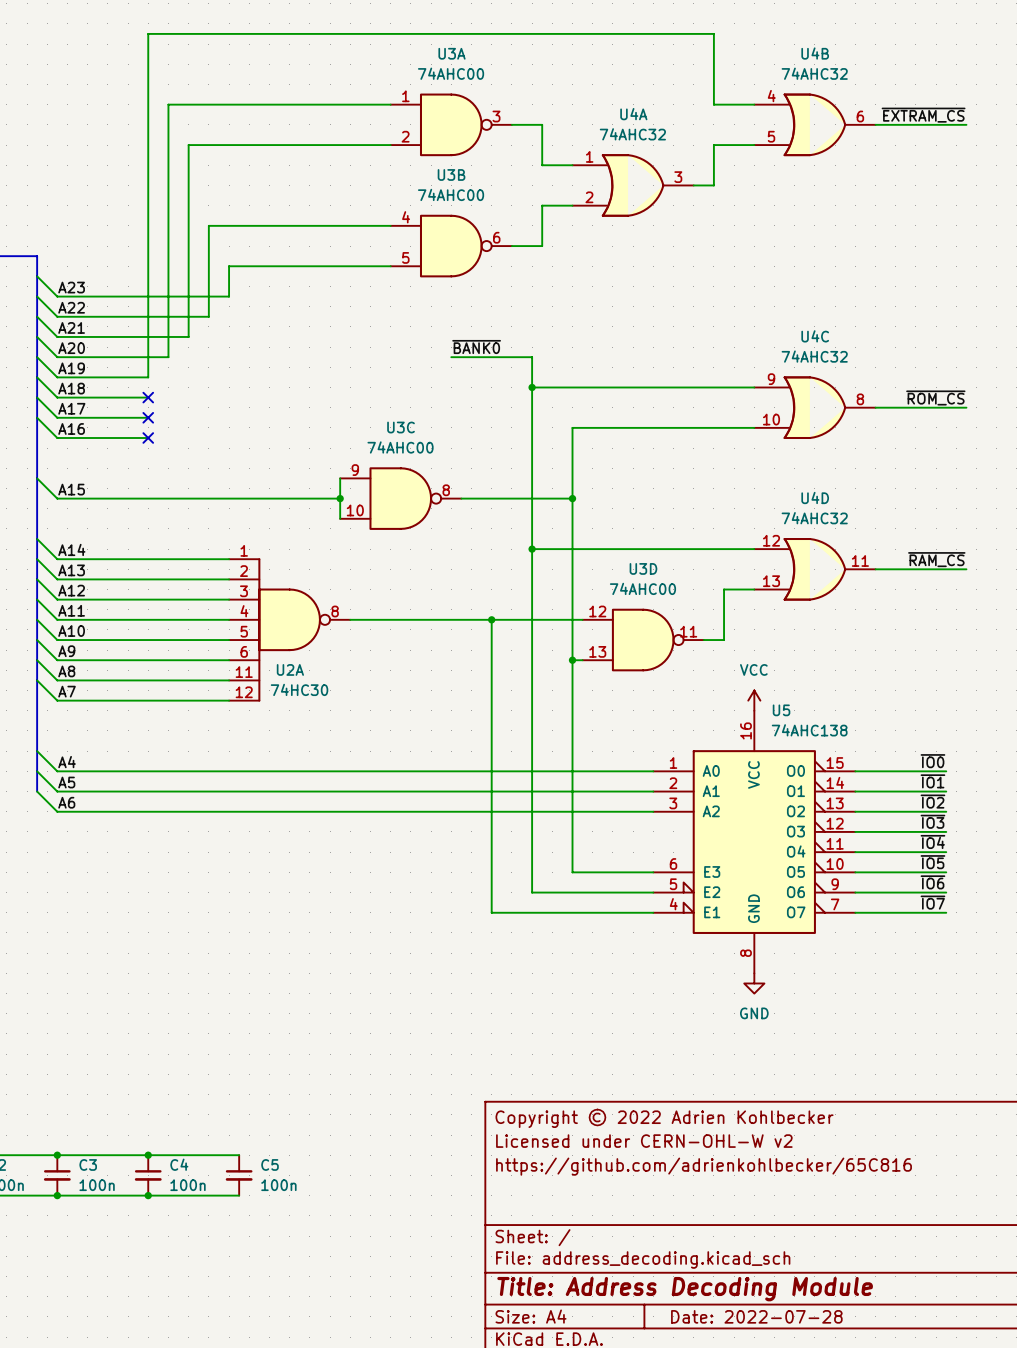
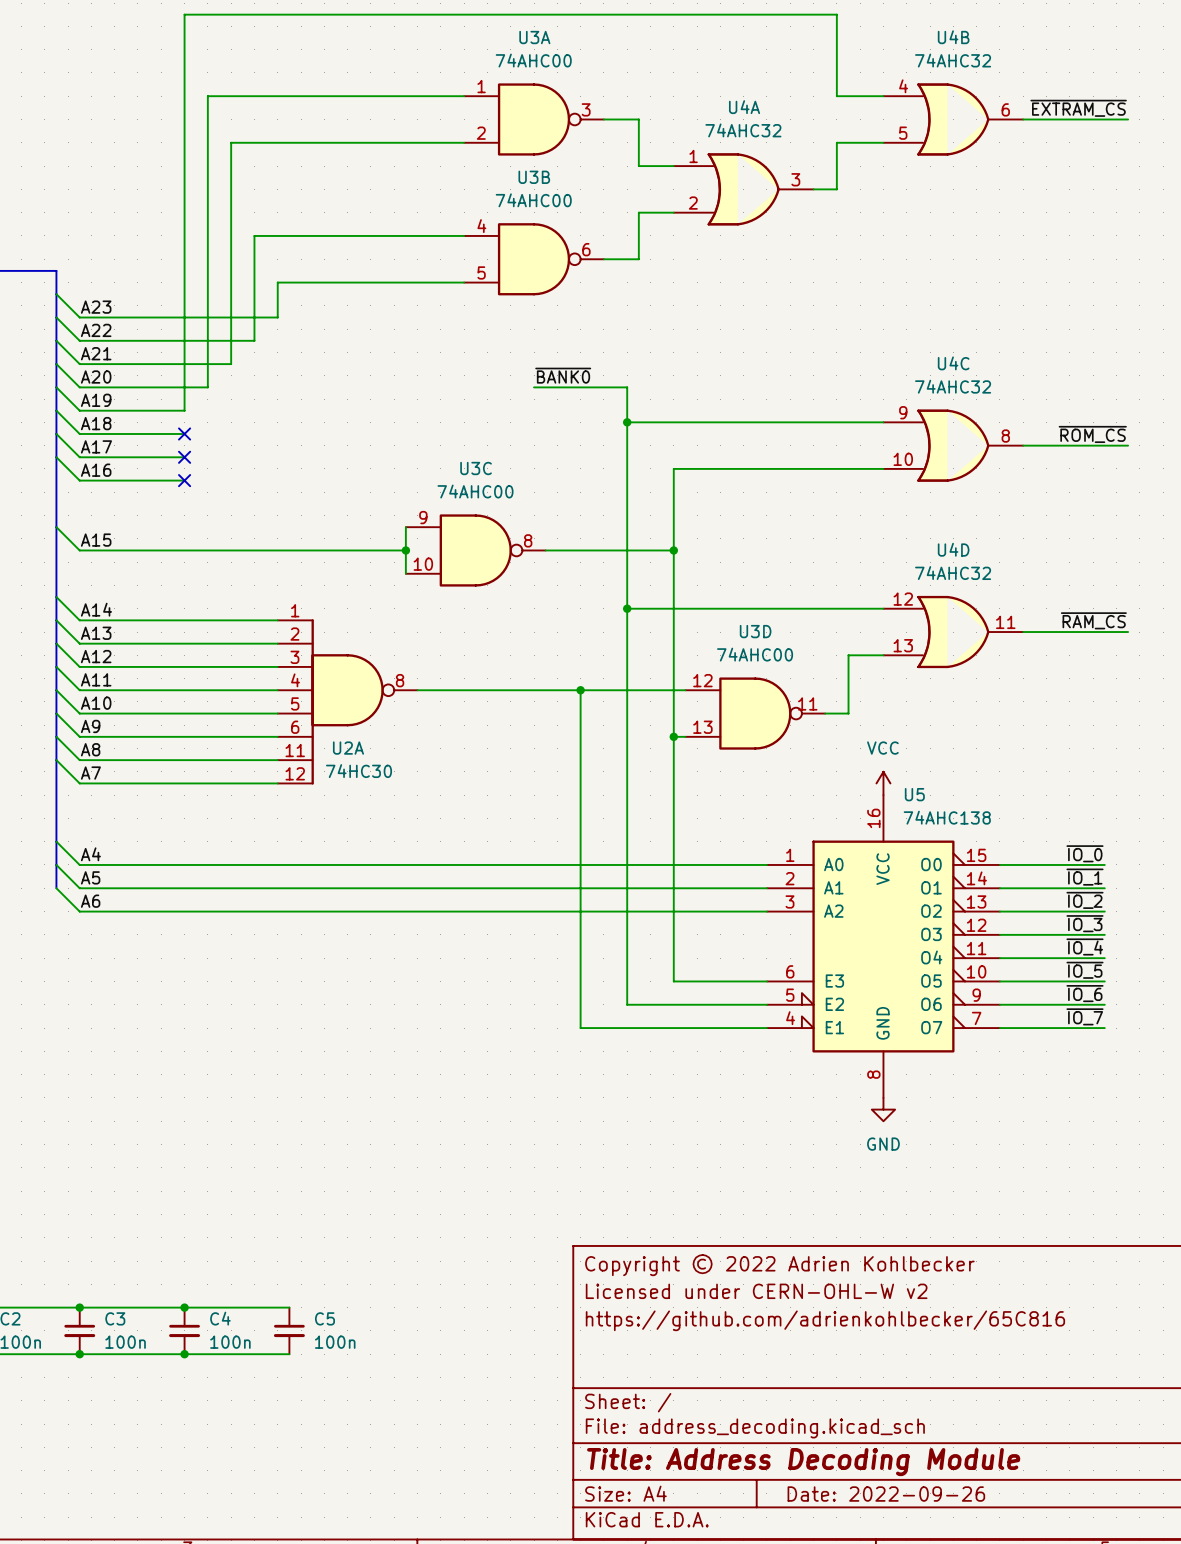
label: ~{IO0} (932, 761) -> ~{IO_0} (1085, 853)
label: ~{IO1} (932, 781) -> ~{IO_1} (1085, 877)
label: ~{IO2} (932, 801) -> ~{IO_2} (1085, 900)
label: ~{IO3} (932, 821) -> ~{IO_3} (1085, 923)
label: ~{IO4} (932, 841) -> ~{IO_4} (1085, 946)
label: ~{IO5} (932, 862) -> ~{IO_5} (1085, 970)
label: ~{IO6} (932, 882) -> ~{IO_6} (1085, 993)
label: ~{IO7} (932, 902) -> ~{IO_7} (1085, 1016)
title block: Date: 2022-07-28 (756, 1316) -> Date: 2022-09-26 (886, 1494)

